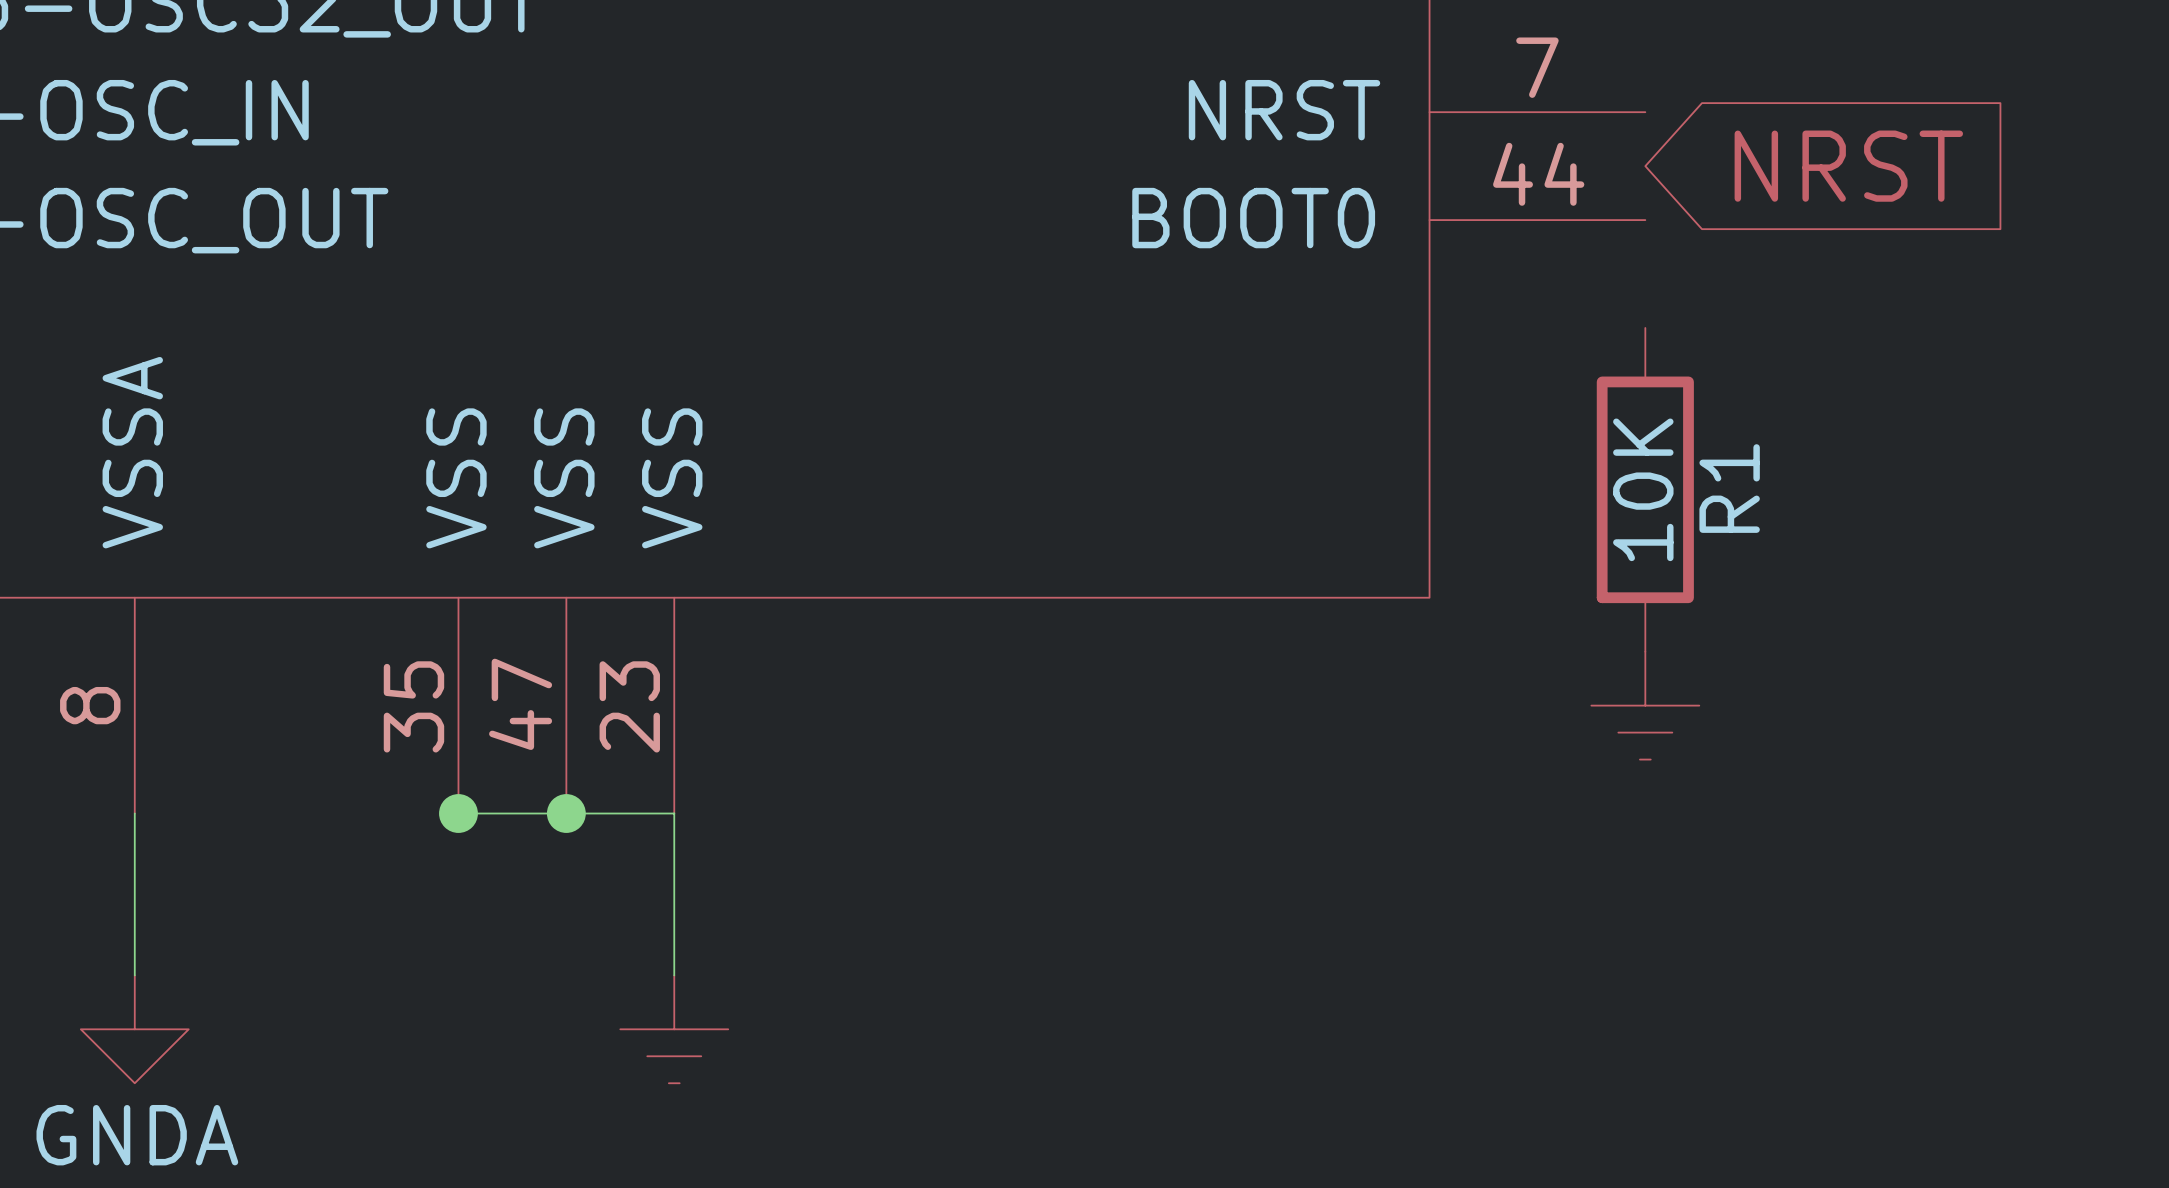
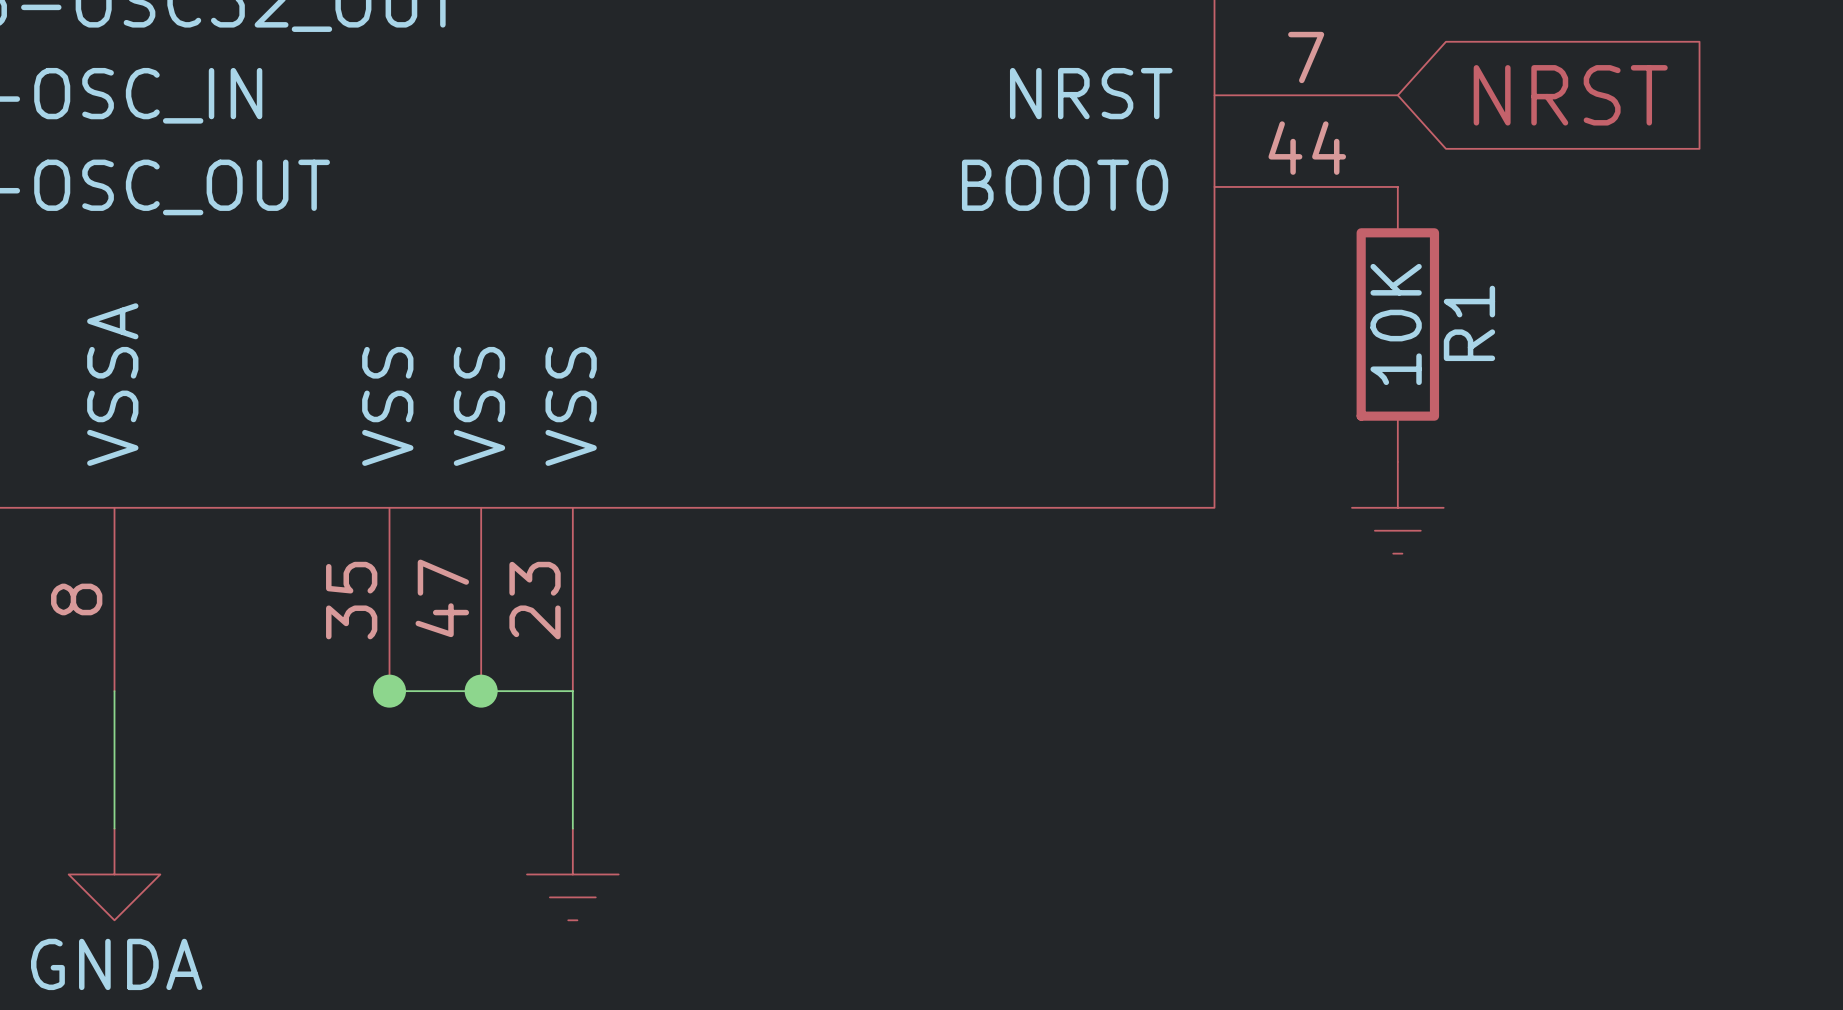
global label position: NRST (1848, 166) -> NRST (1570, 95)
R1 position: (1645, 489) -> (1397, 324)
power symbol position: (1645, 705) -> (1397, 507)

